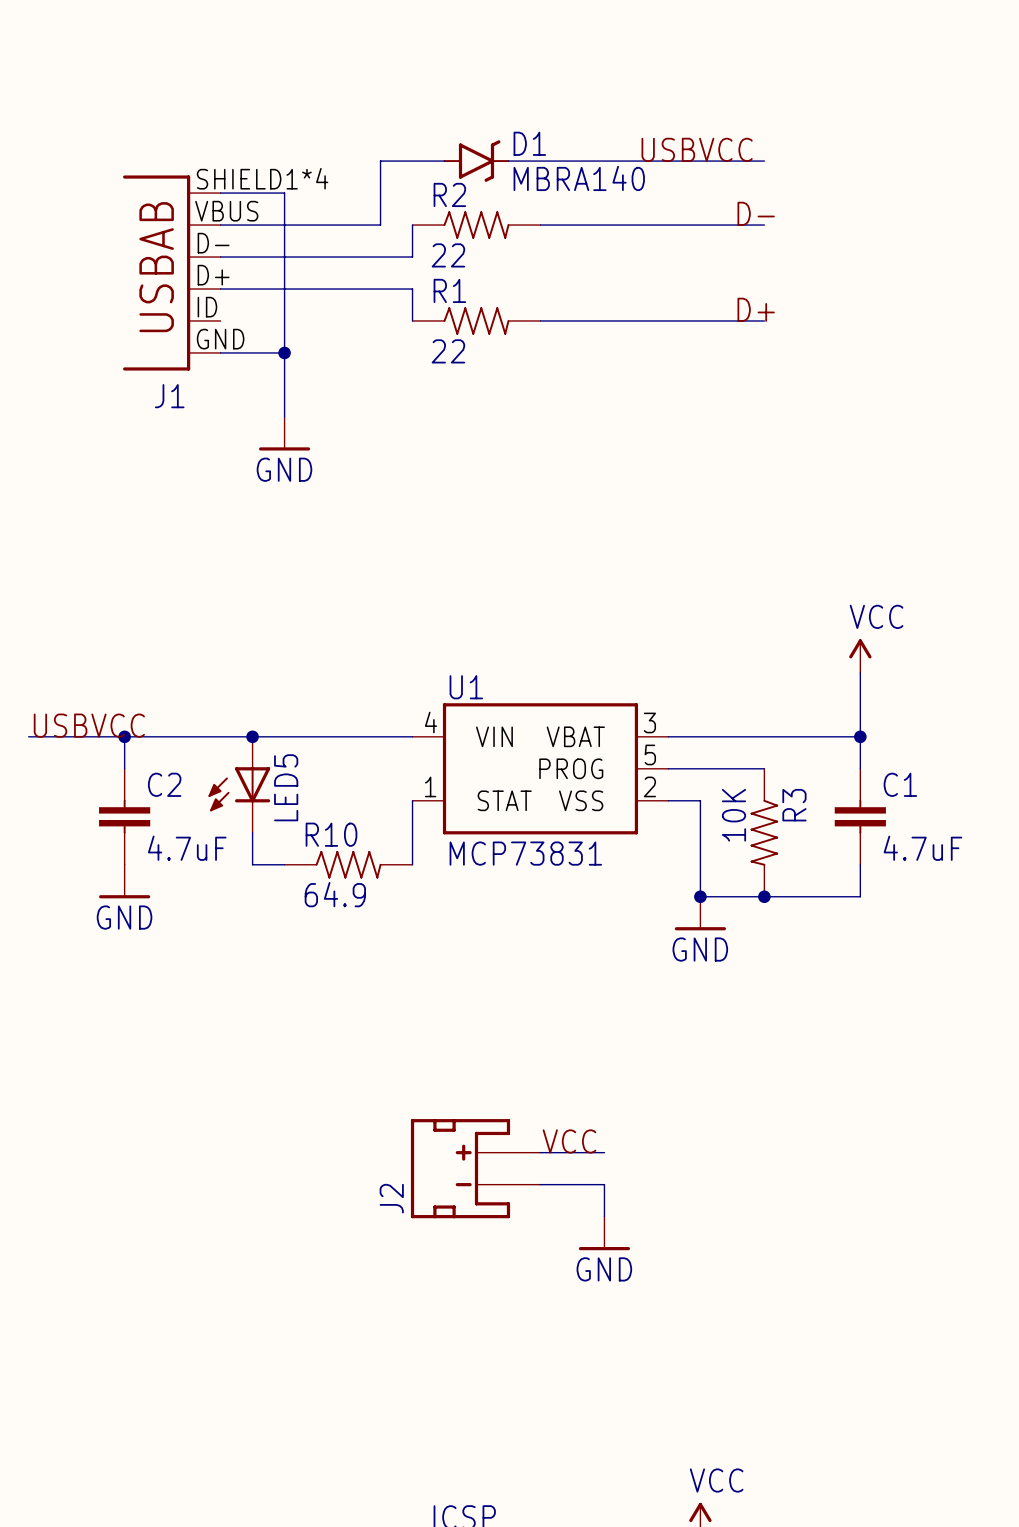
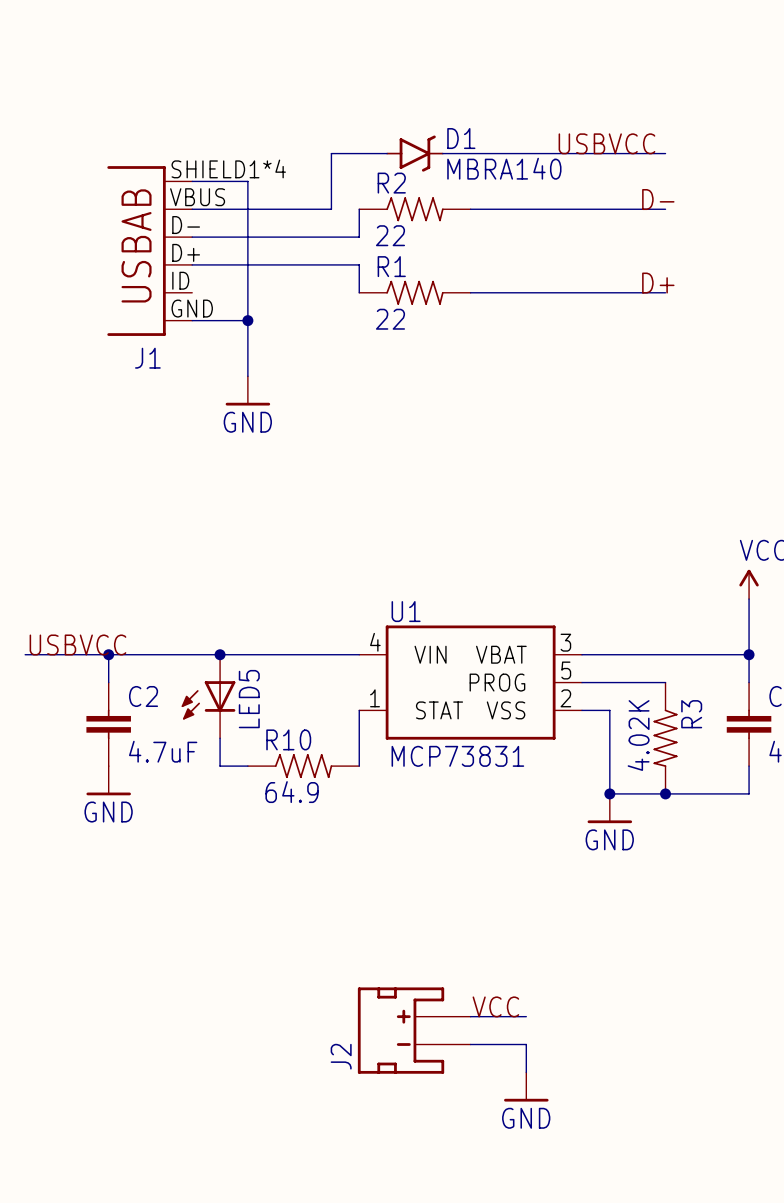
R3 value: 10K (733, 815) -> 4.02K (638, 735)

